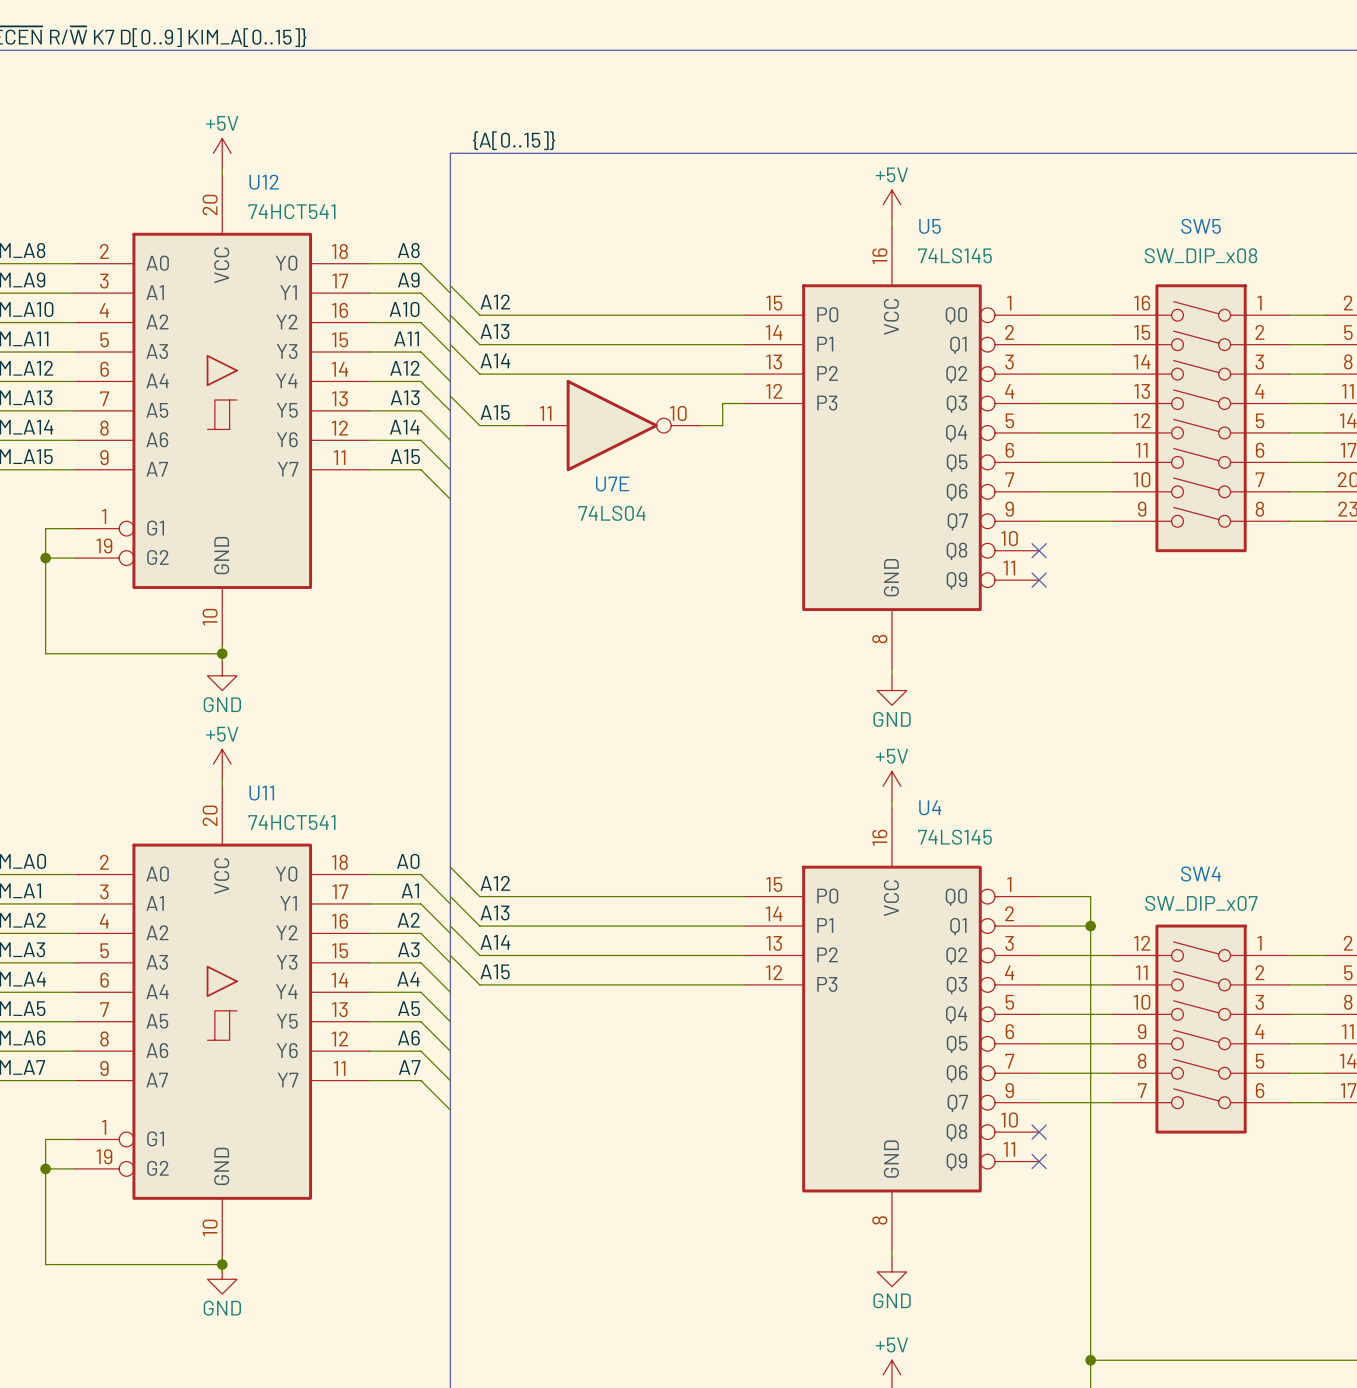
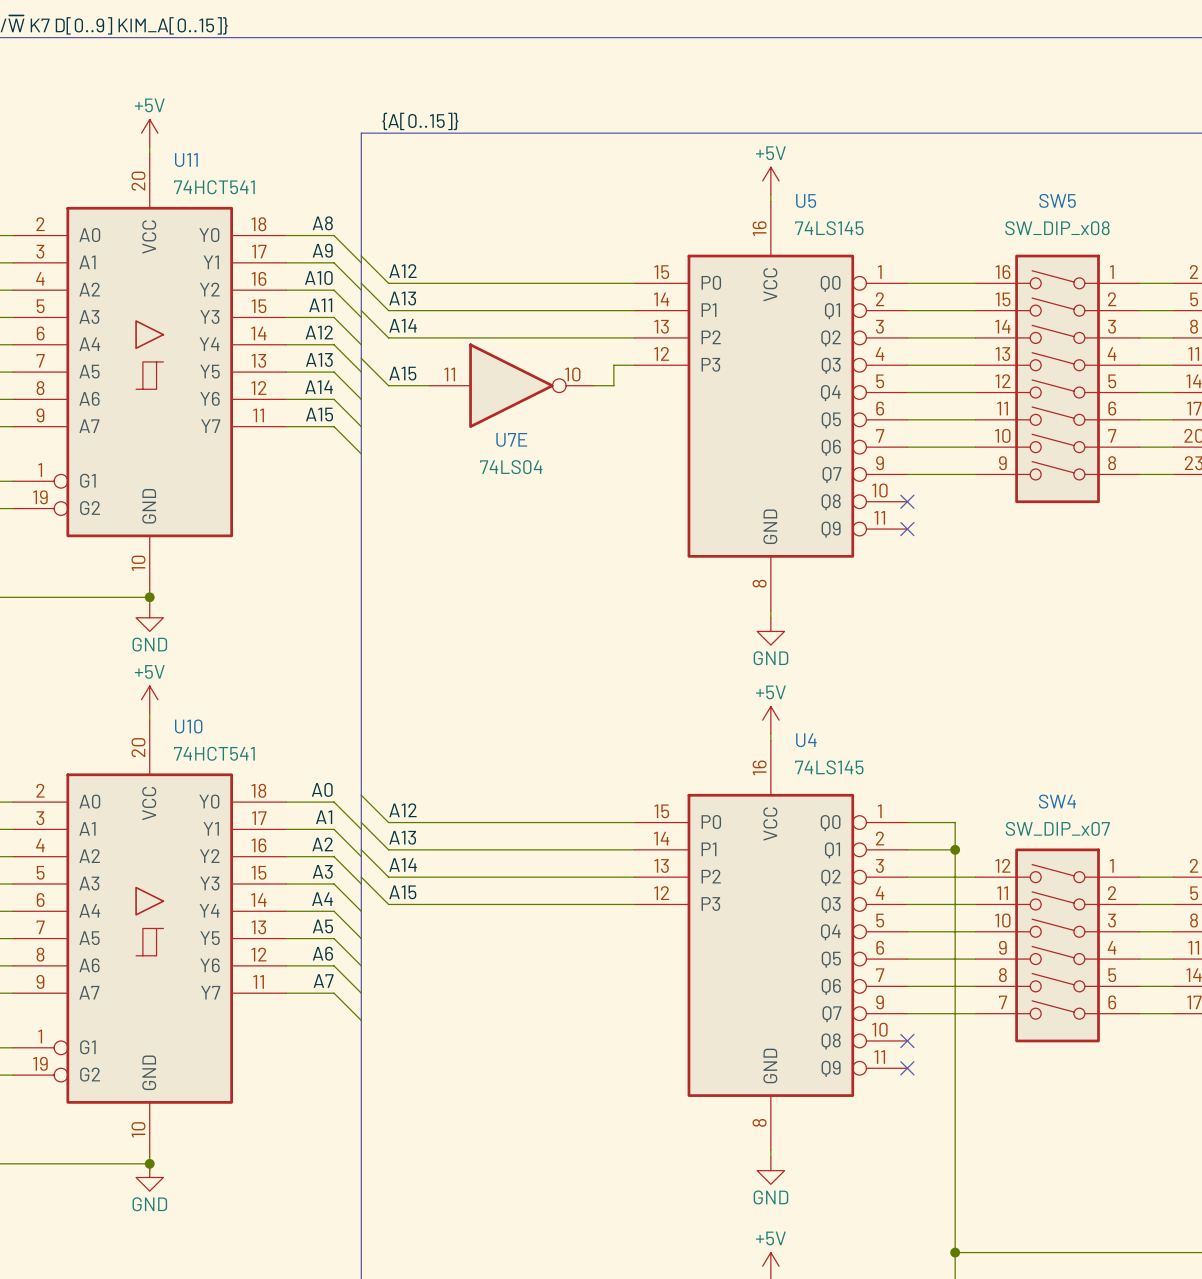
U12 name: U12 (264, 182) -> U11 (186, 160)
U11 name: U11 (261, 793) -> U10 (188, 726)

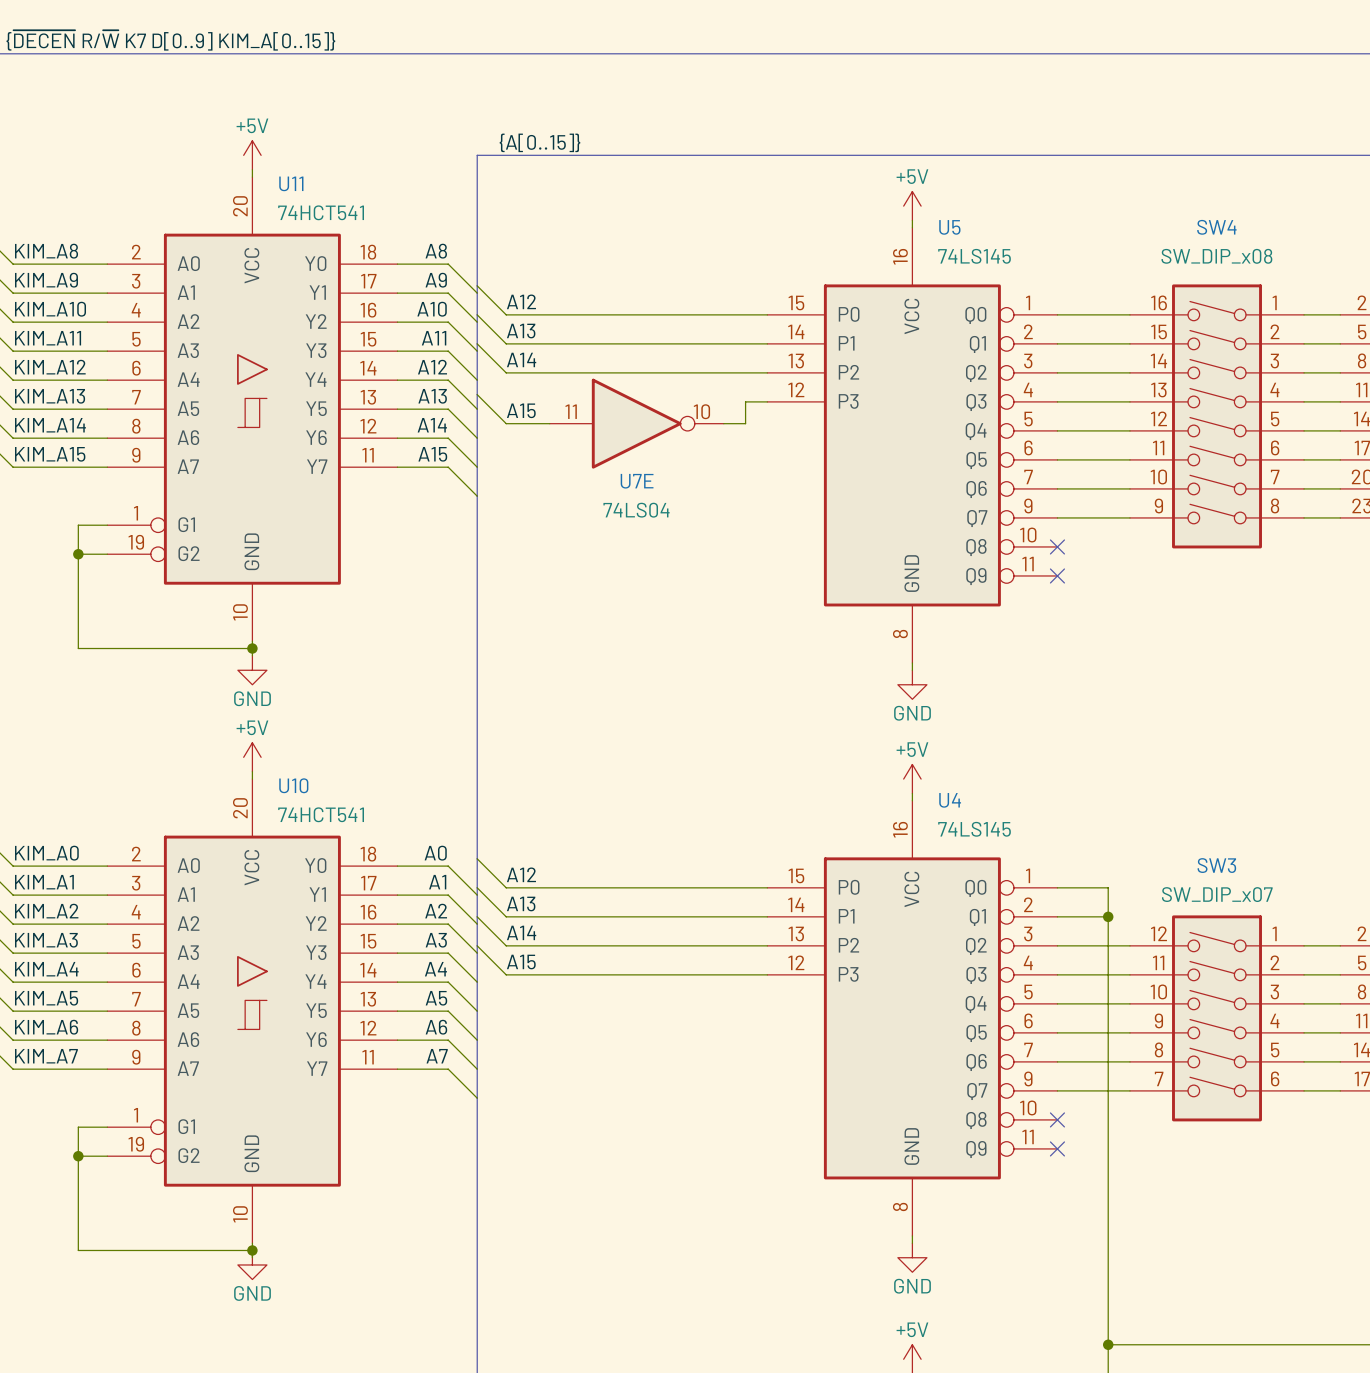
SW5 name: SW5 (1057, 200) -> SW4 (1216, 227)
SW4 name: SW4 (1057, 801) -> SW3 (1216, 865)

